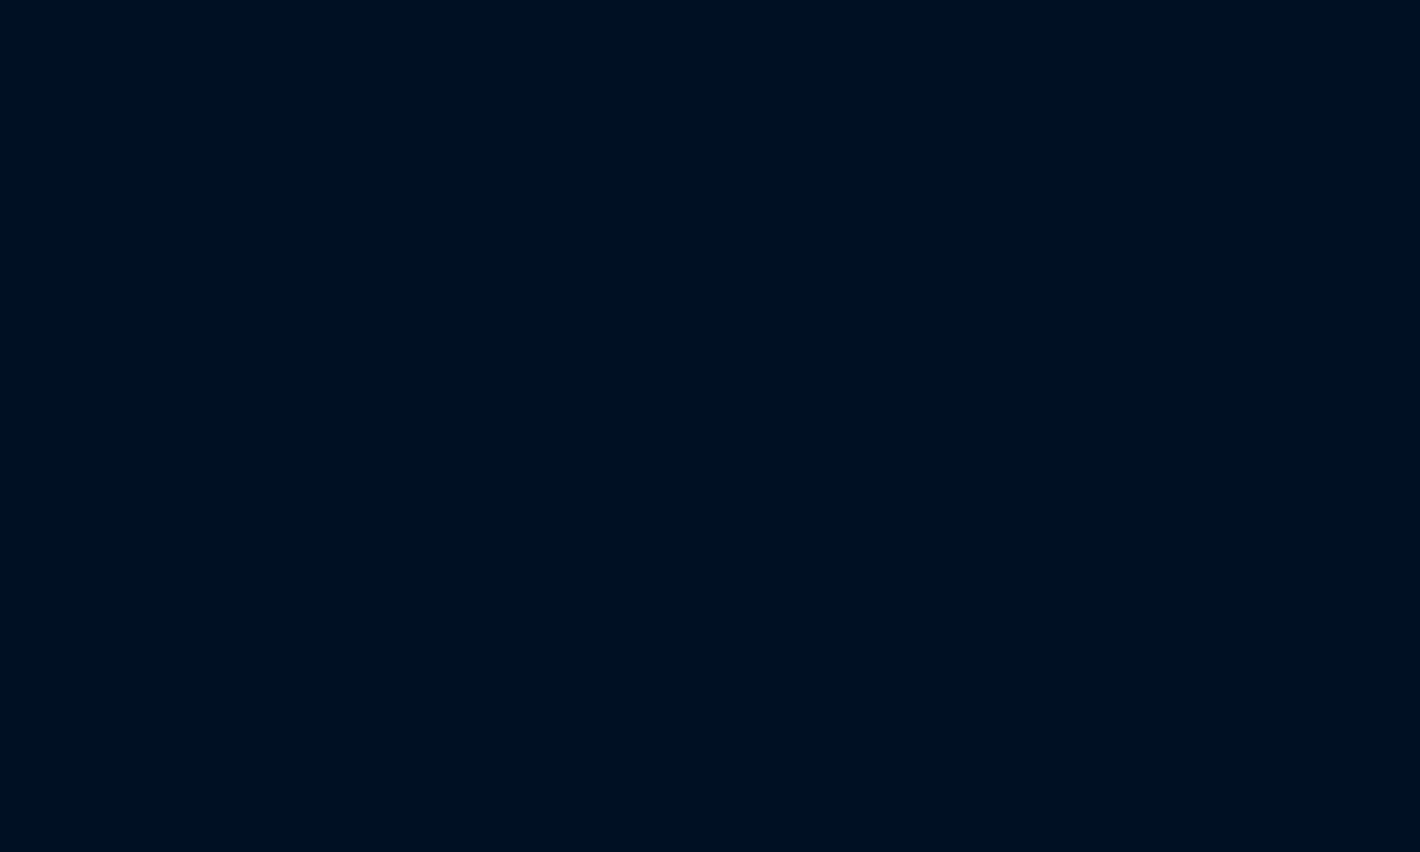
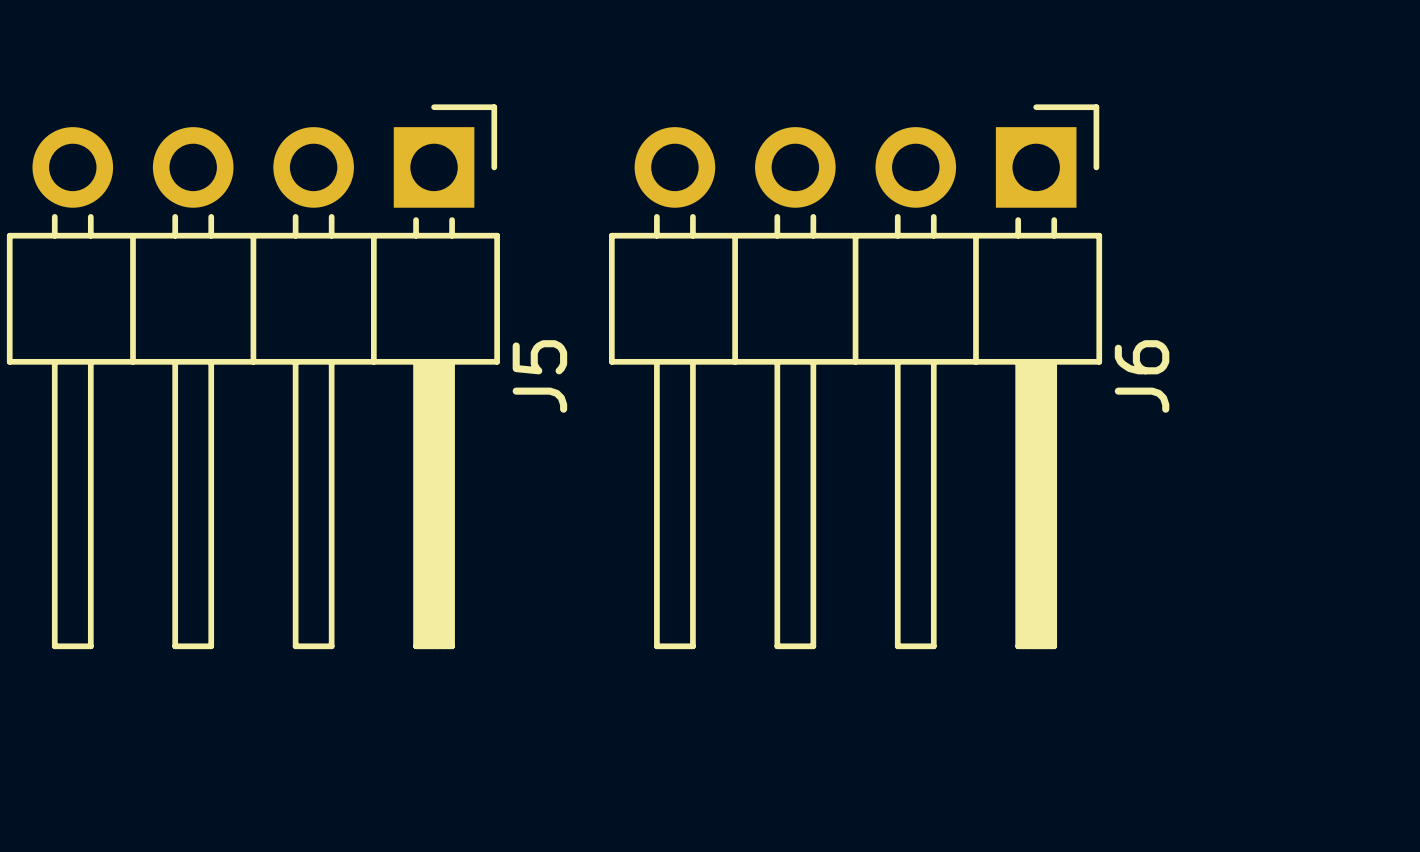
J5: none -> (253, 376)
J6: none -> (855, 376)

